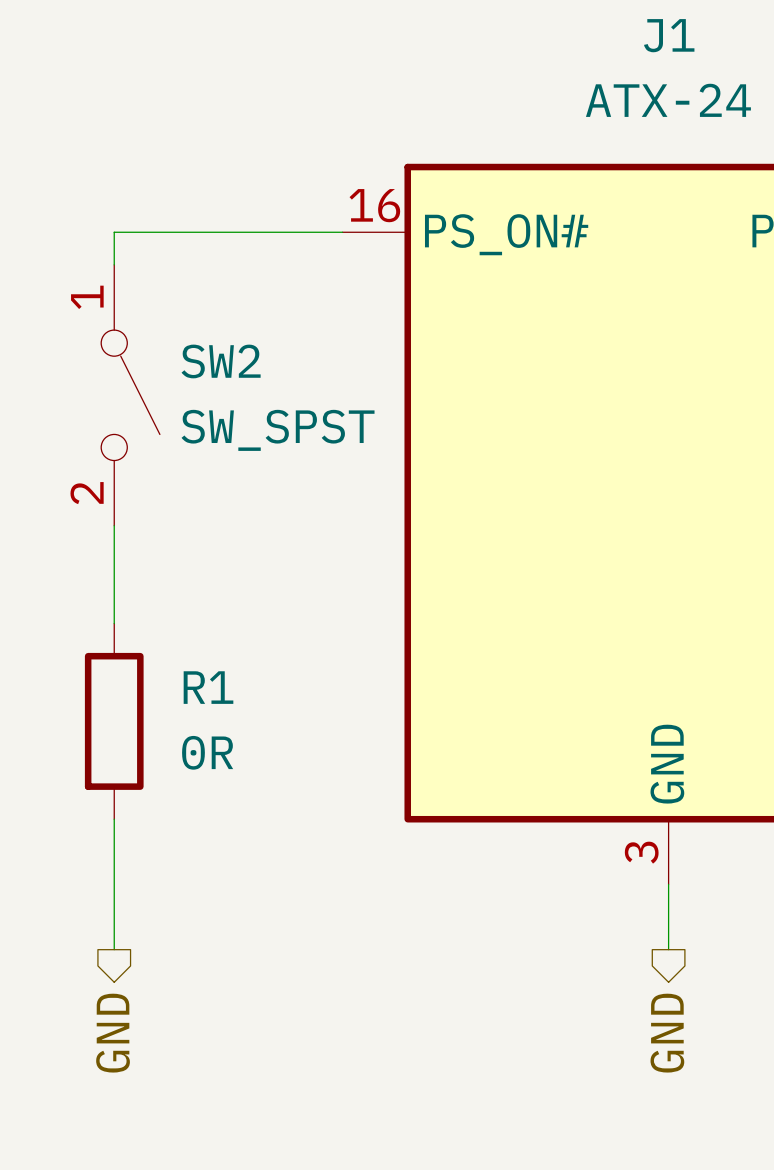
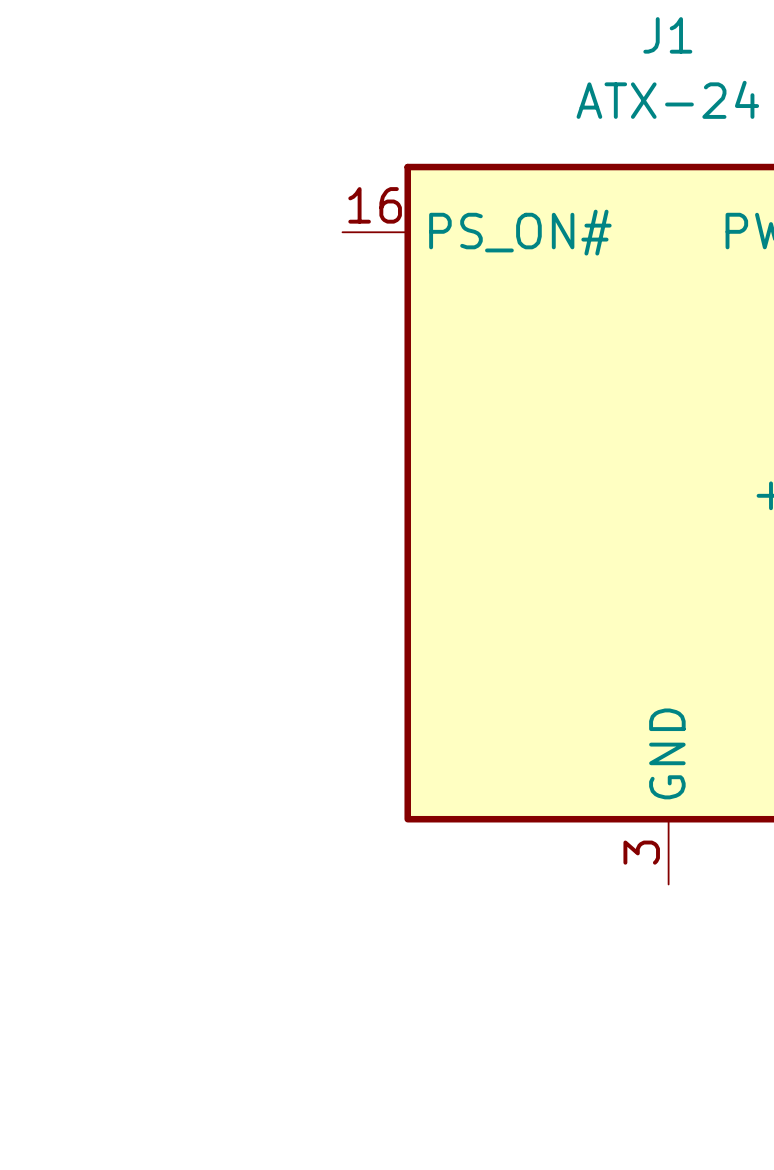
wire: (342, 232) (114, 232) (114, 264) -> none
SW2: SW_SPST (130, 395) -> none
wire: (114, 525) (114, 623) -> none
R1: 0R (114, 721) -> none
wire: (114, 819) (114, 949) -> none
wire: (668, 884) (668, 949) -> none
hierarchical label: GND (113, 1033) -> none
hierarchical label: GND (667, 1033) -> none

